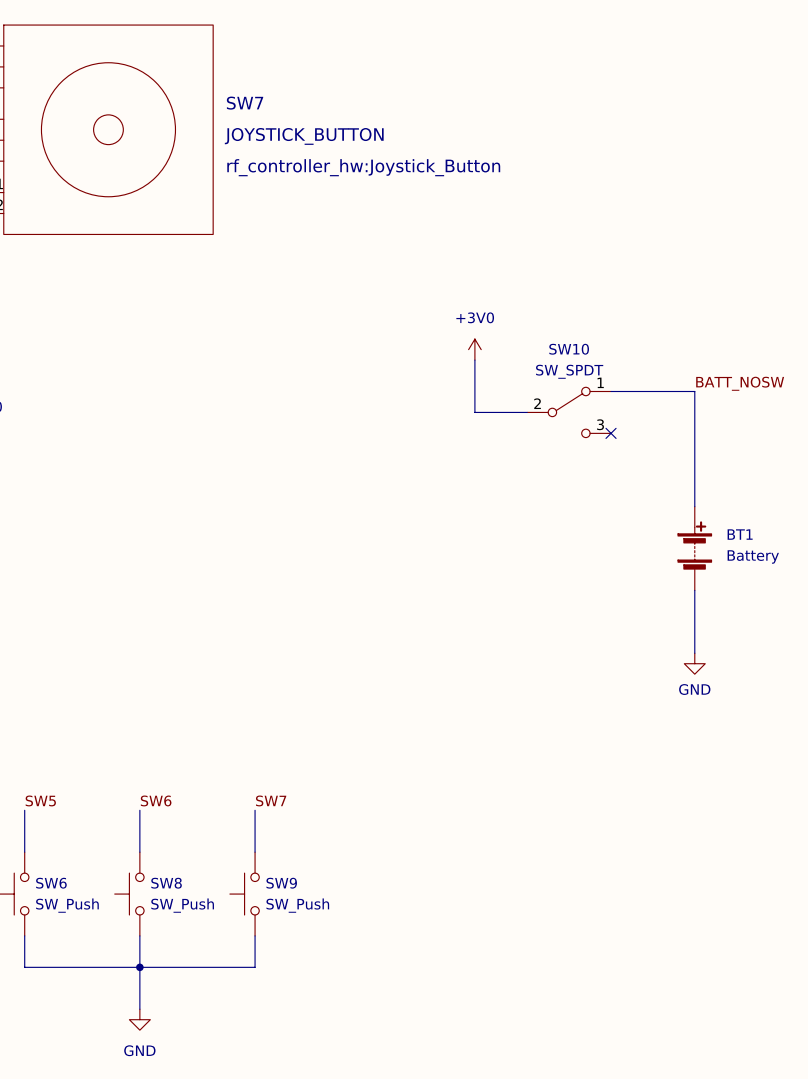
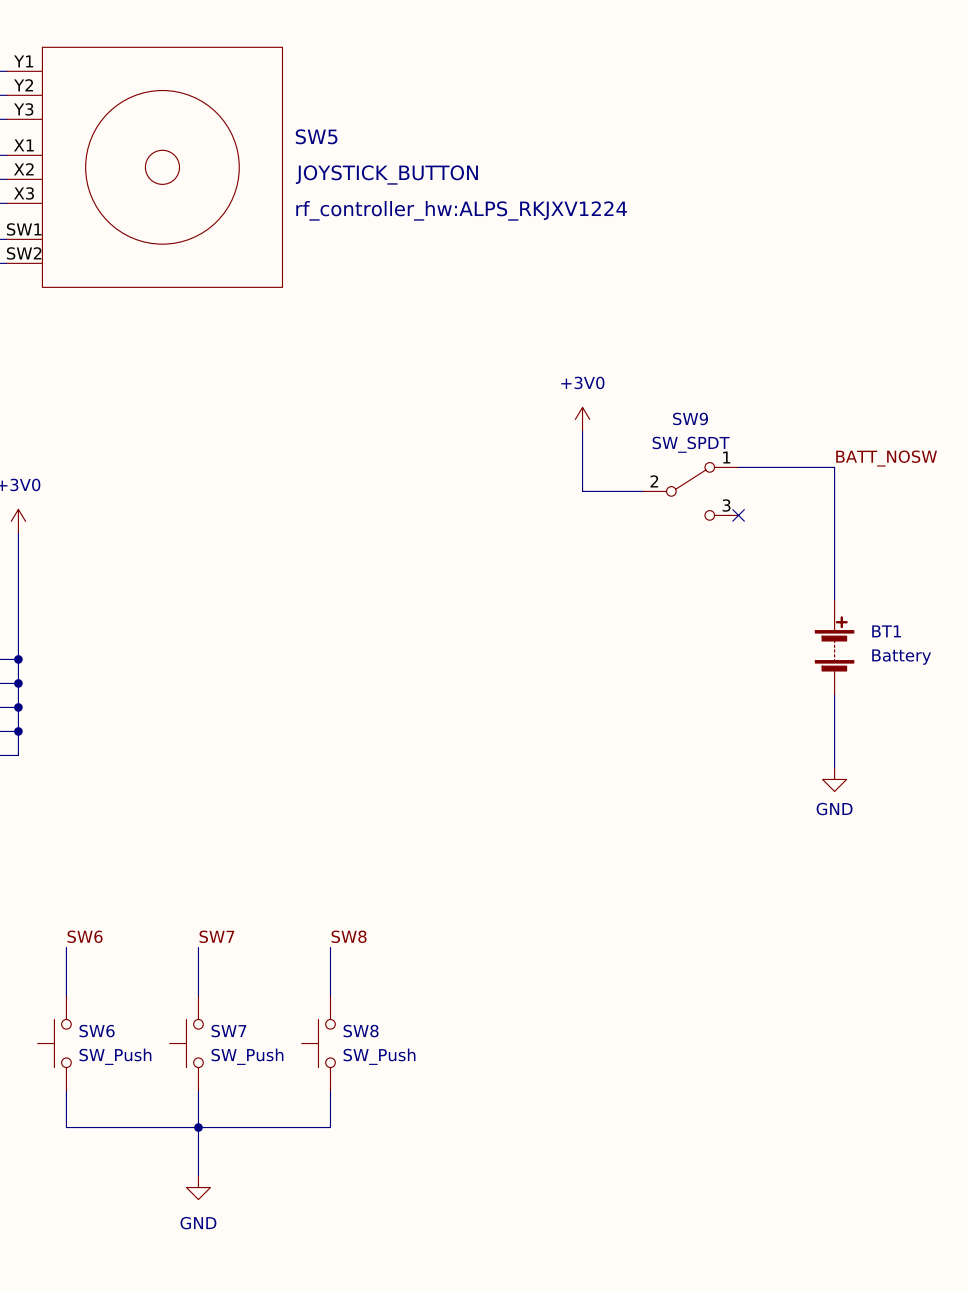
SW7 name: SW7 (245, 103) -> SW5 (316, 136)
SW7 text: rf_controller_hw:Joystick_Button (363, 167) -> rf_controller_hw:ALPS_RKJXV1224 (461, 210)
SW10 name: SW10 (569, 349) -> SW9 (690, 418)
label: SW5 (40, 800) -> SW6 (85, 936)
label: SW6 (156, 800) -> SW7 (216, 936)
label: SW7 (271, 800) -> SW8 (349, 936)
SW8 name: SW8 (166, 883) -> SW7 (228, 1031)
SW9 name: SW9 (281, 883) -> SW8 (361, 1031)

